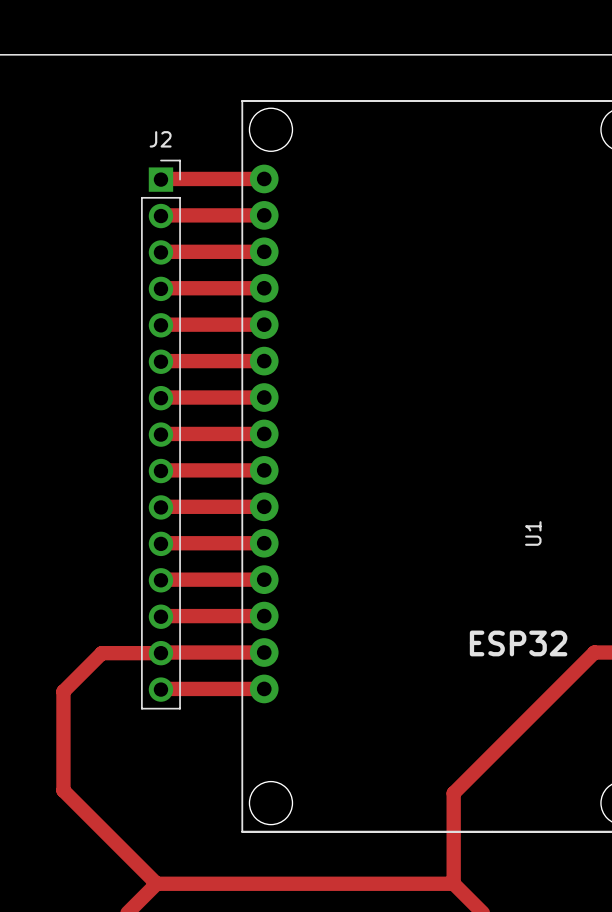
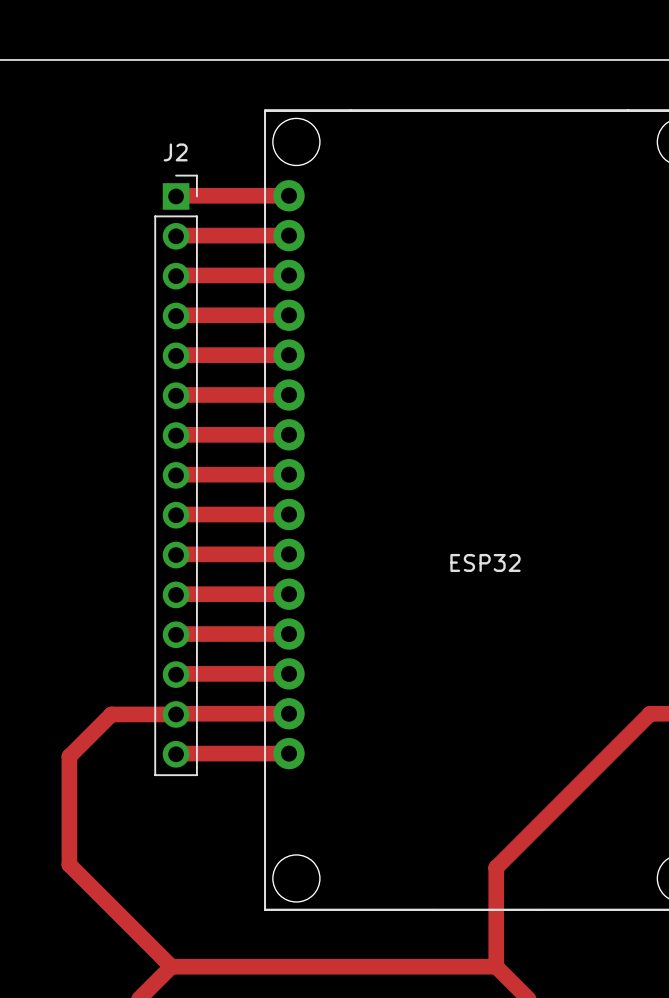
U1 name: U1 (533, 533) -> ESP32 (485, 562)
text: ESP32 (518, 643) -> none

